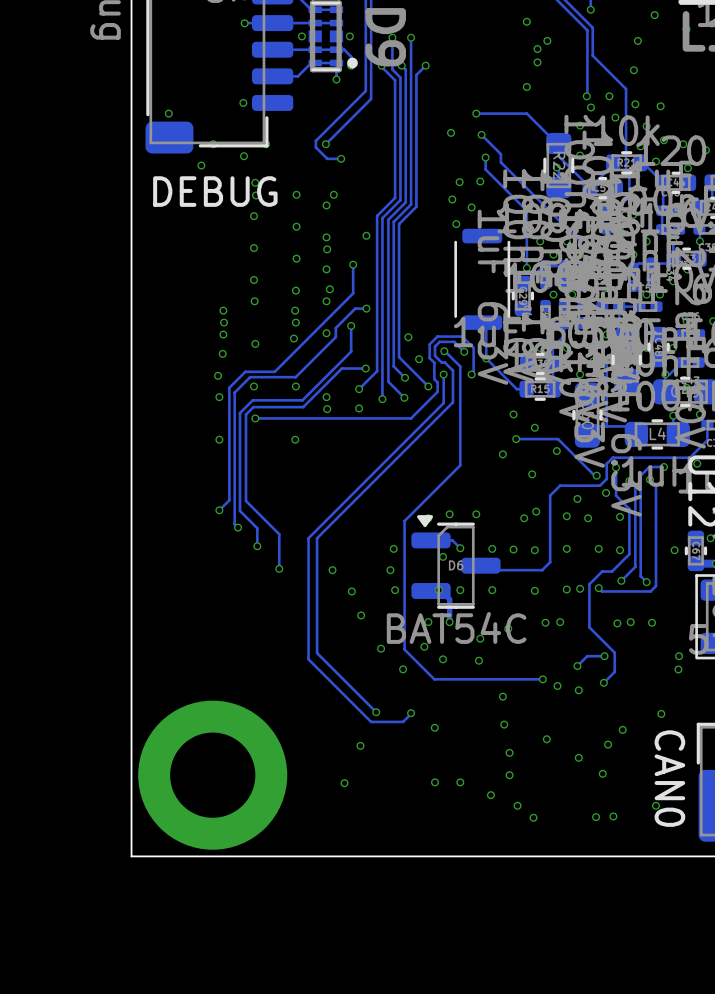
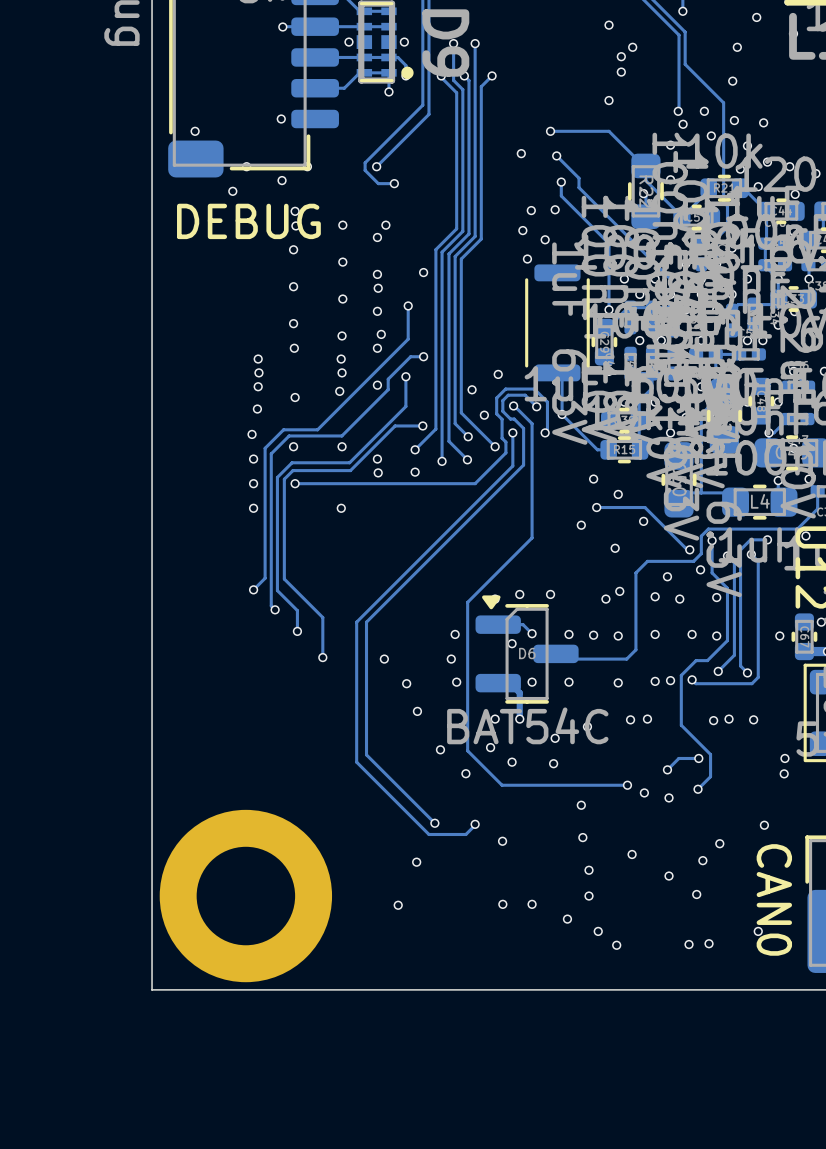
via: none -> (498, 374)
via: none -> (253, 483)
via: (439, 590) -> none

